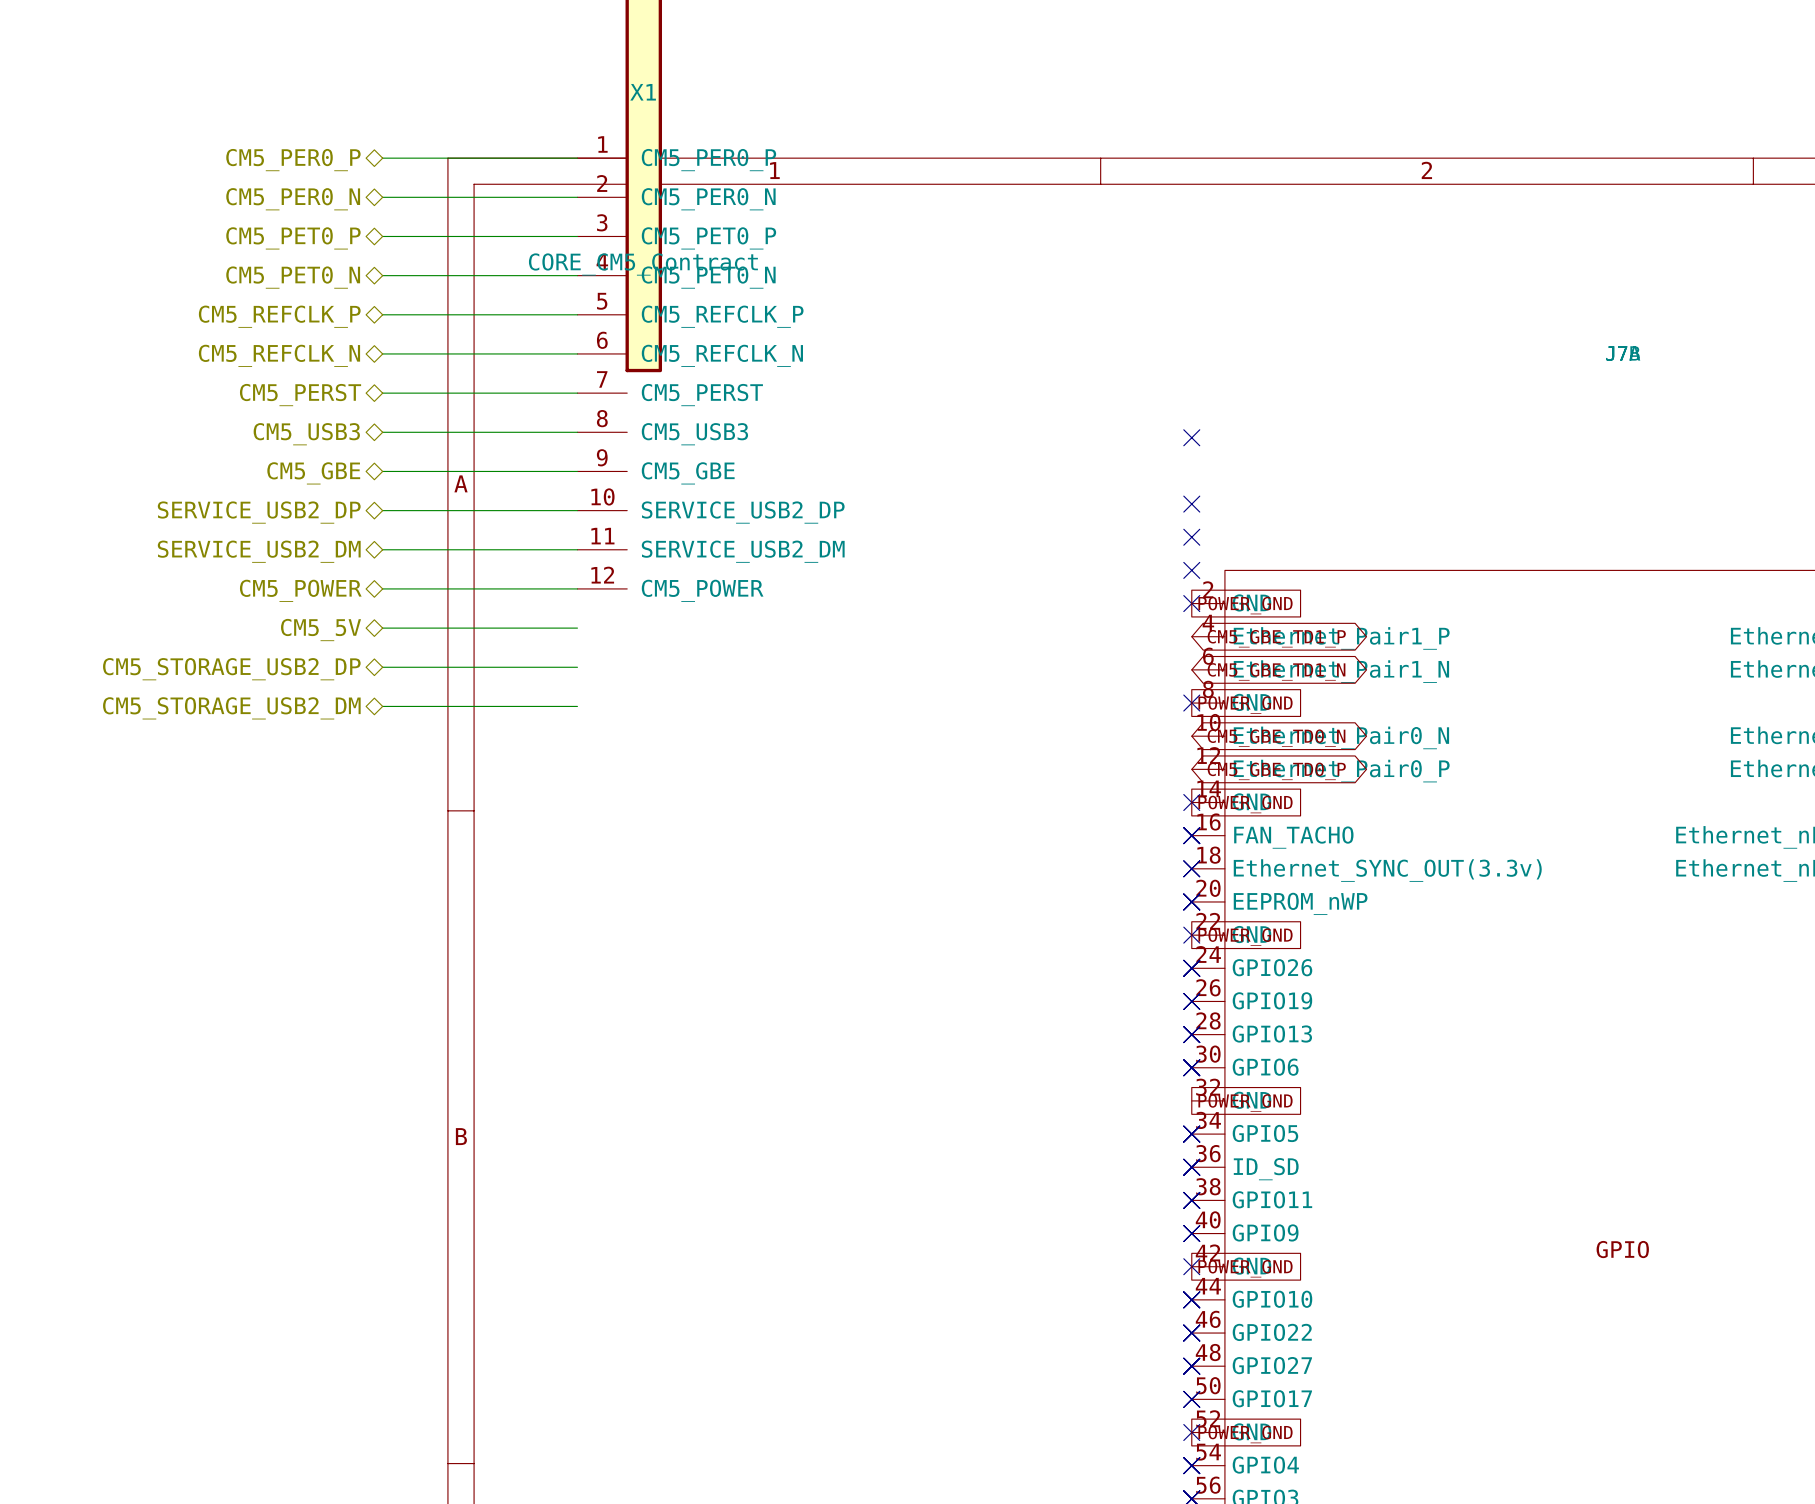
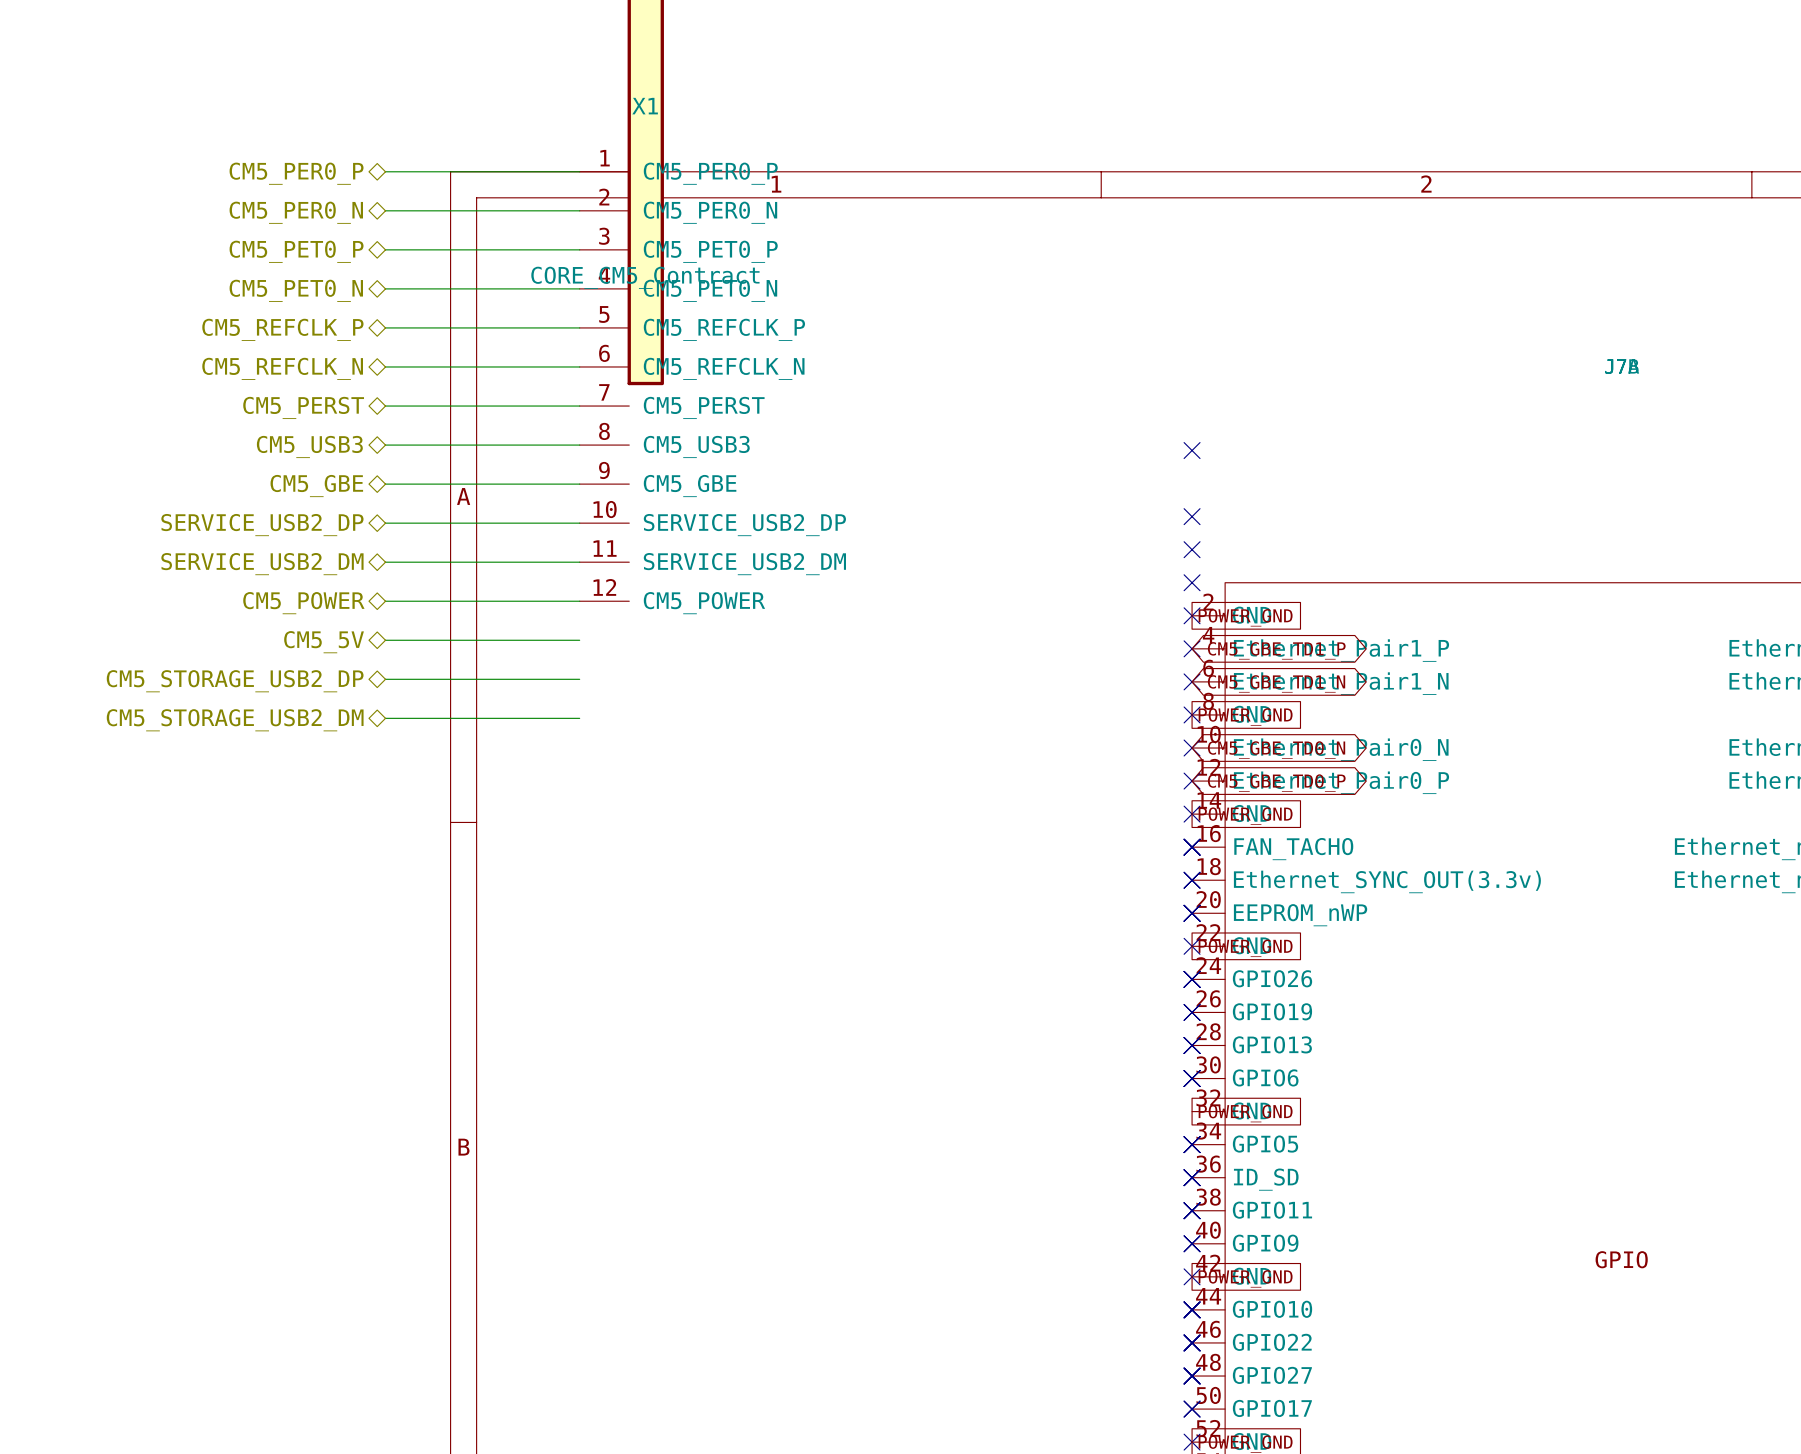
no-connect mark: none -> (1192, 648)
no-connect mark: none -> (1192, 681)
no-connect mark: none -> (1192, 748)
no-connect mark: none -> (1192, 781)

